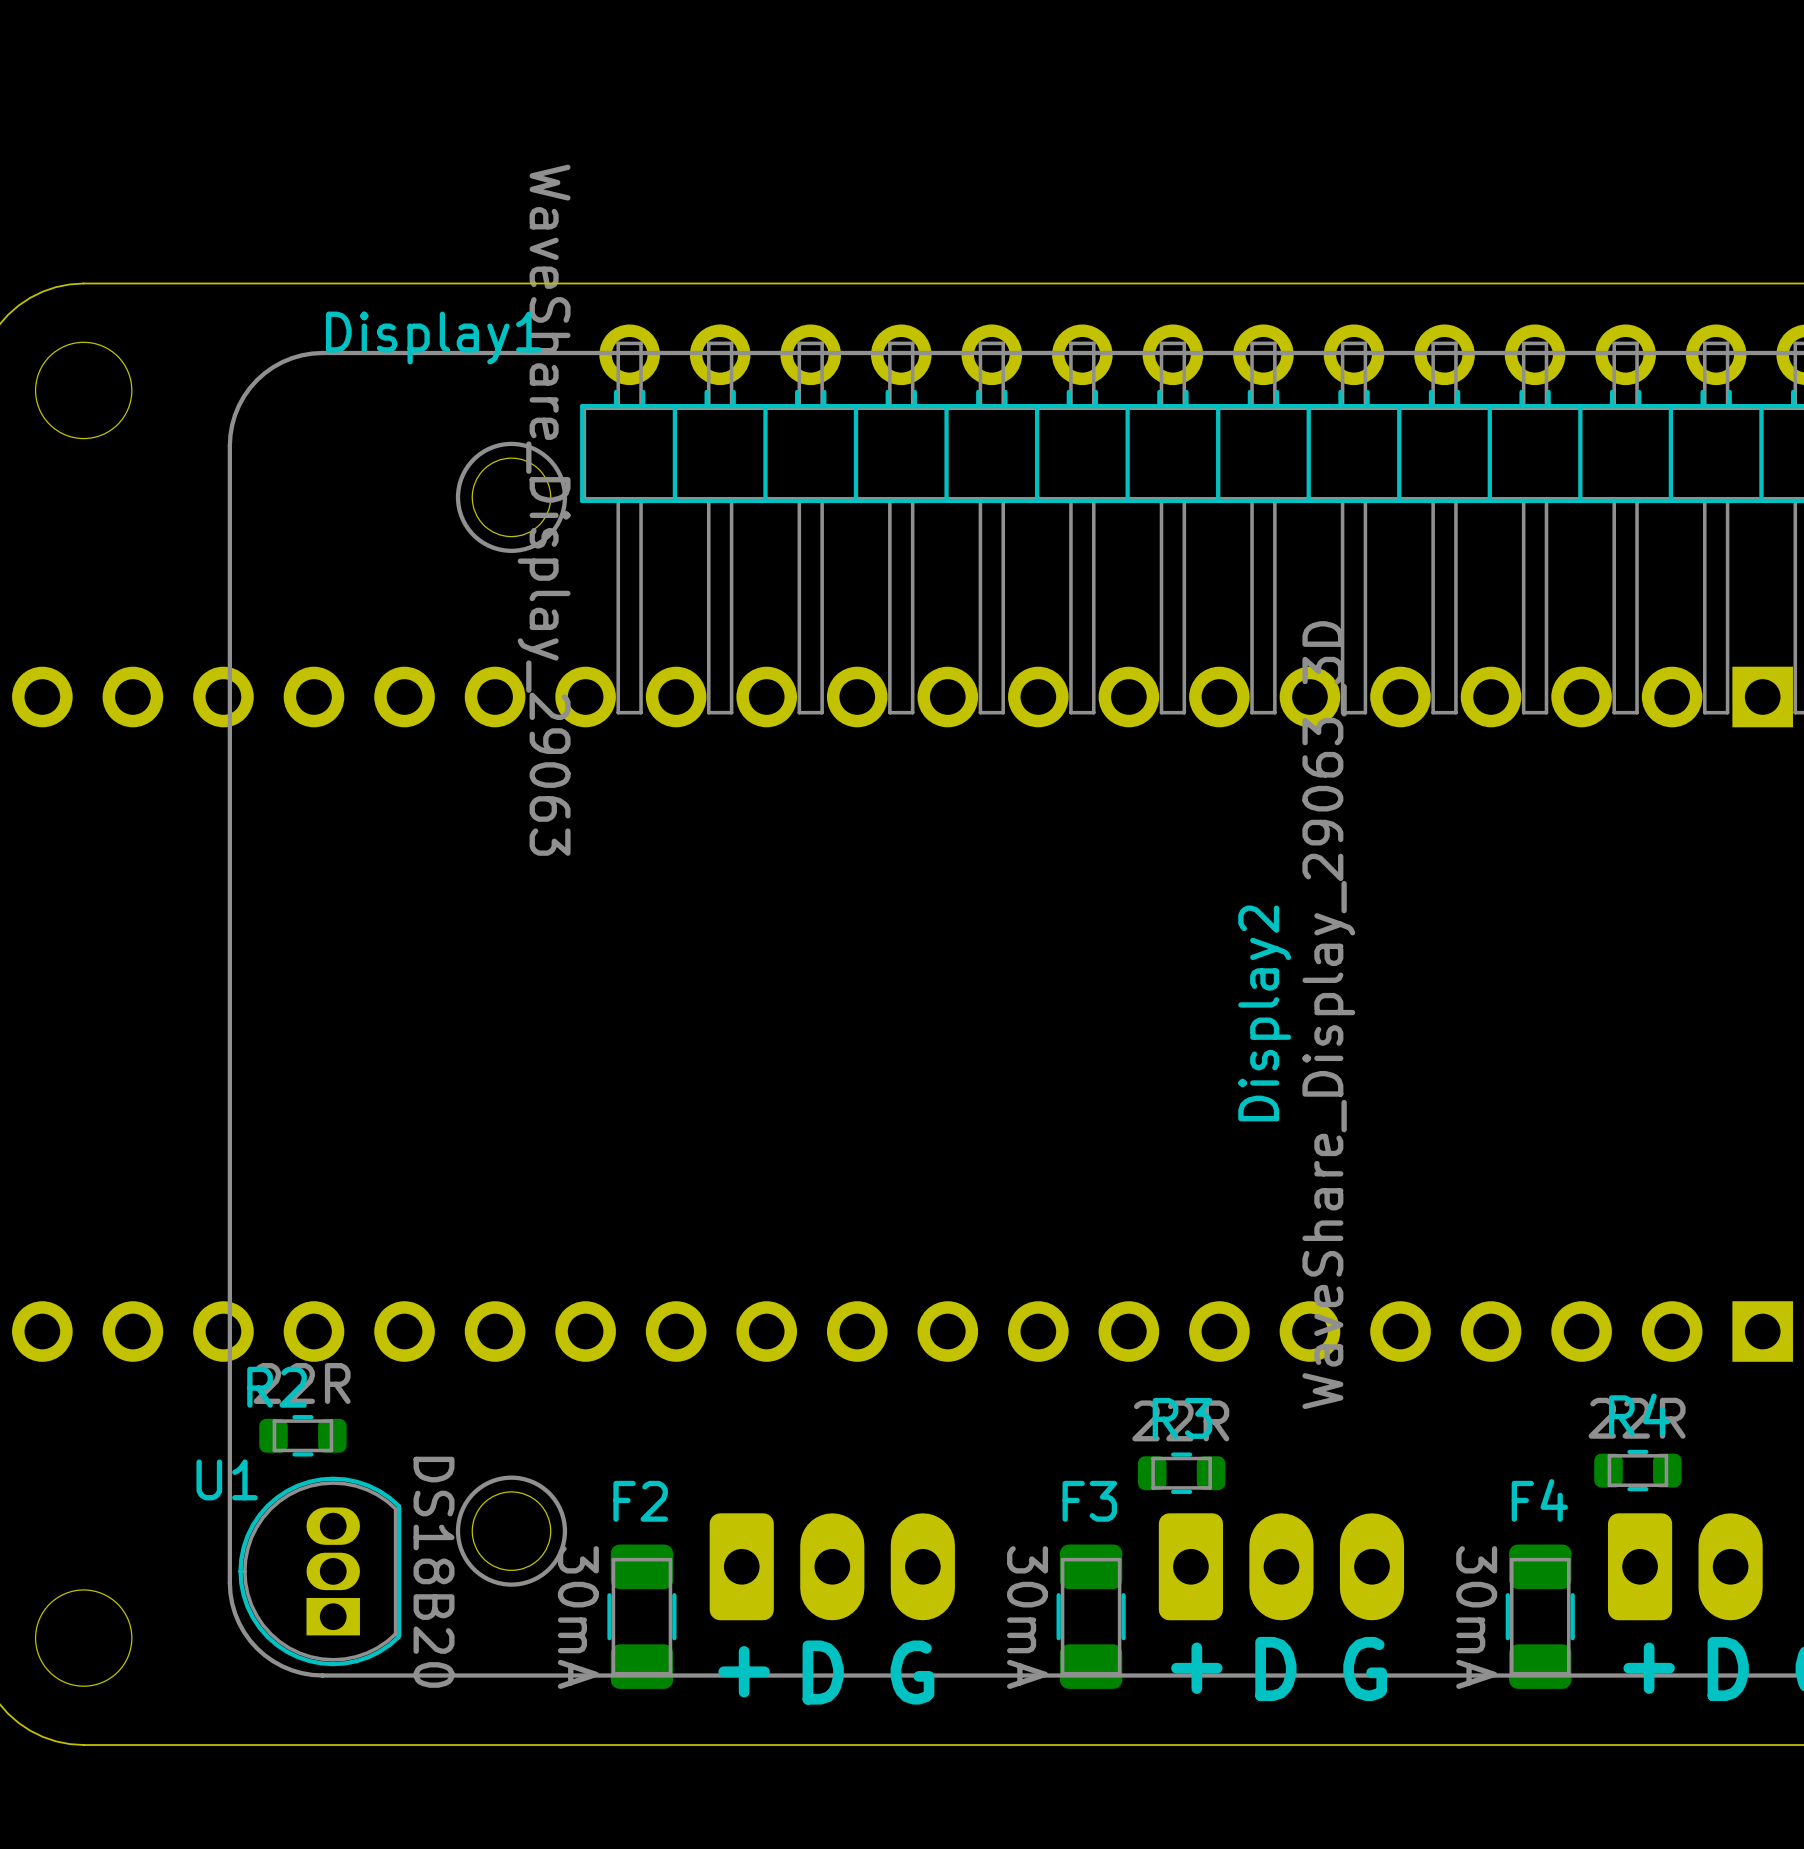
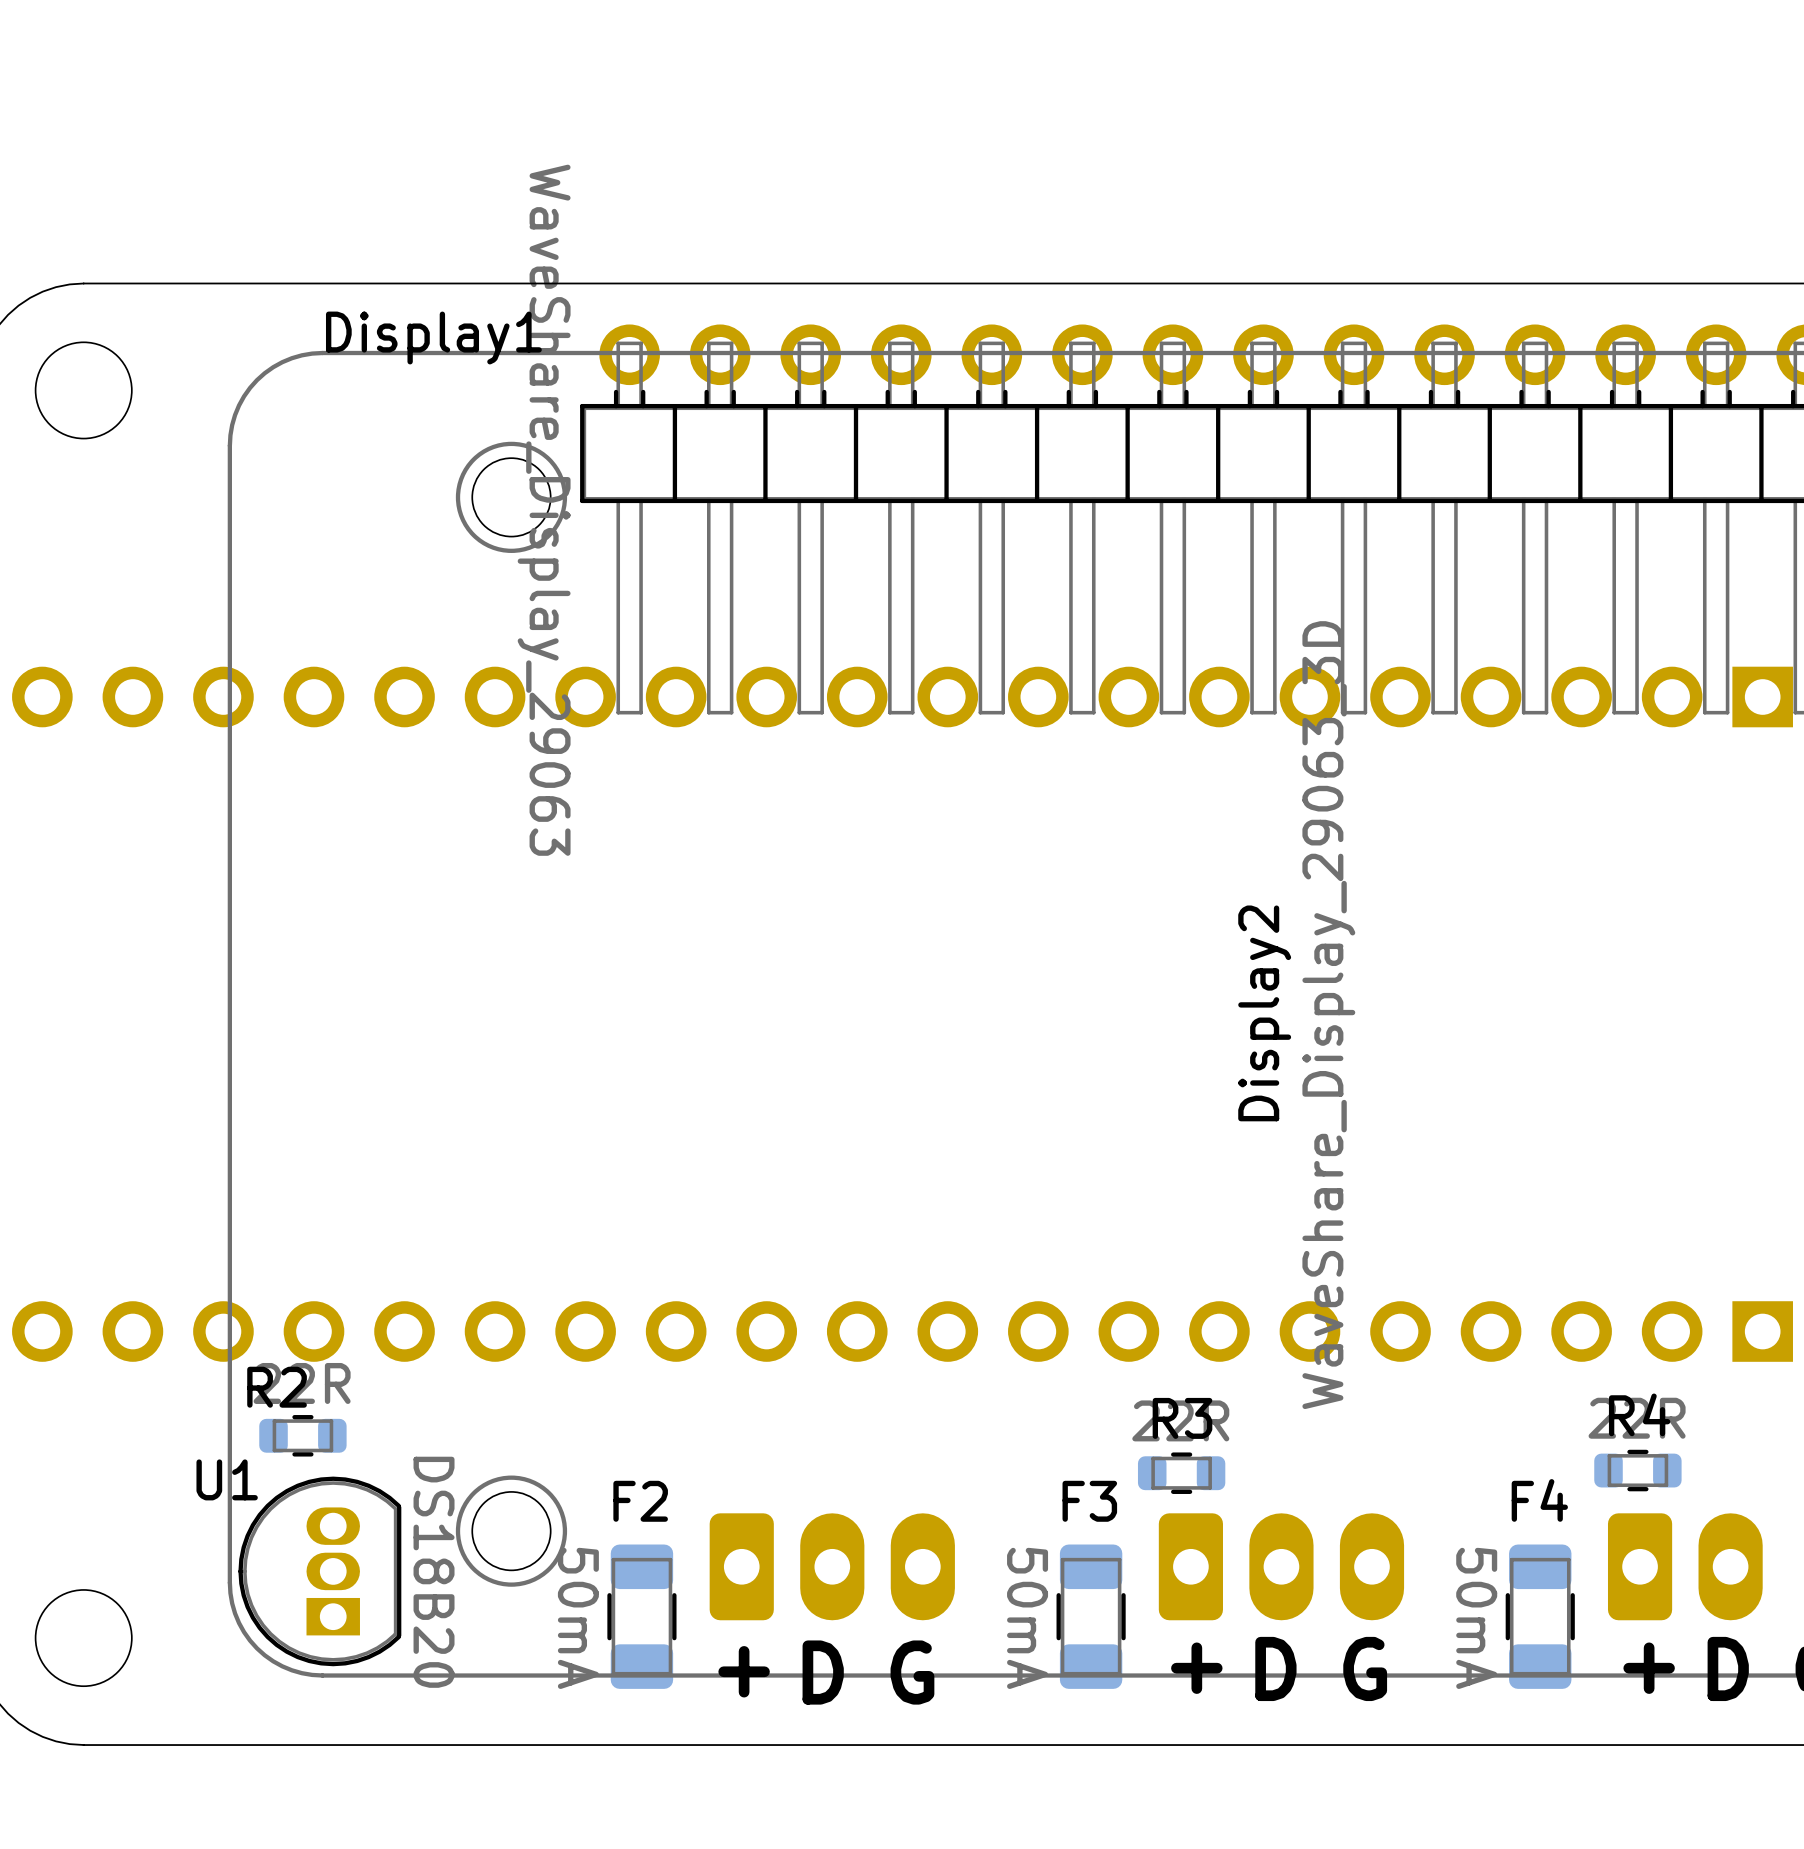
F2 value: 30mA (578, 1617) -> 50mA (578, 1618)
F3 value: 30mA (1027, 1617) -> 50mA (1027, 1618)
F4 value: 30mA (1476, 1617) -> 50mA (1476, 1618)

